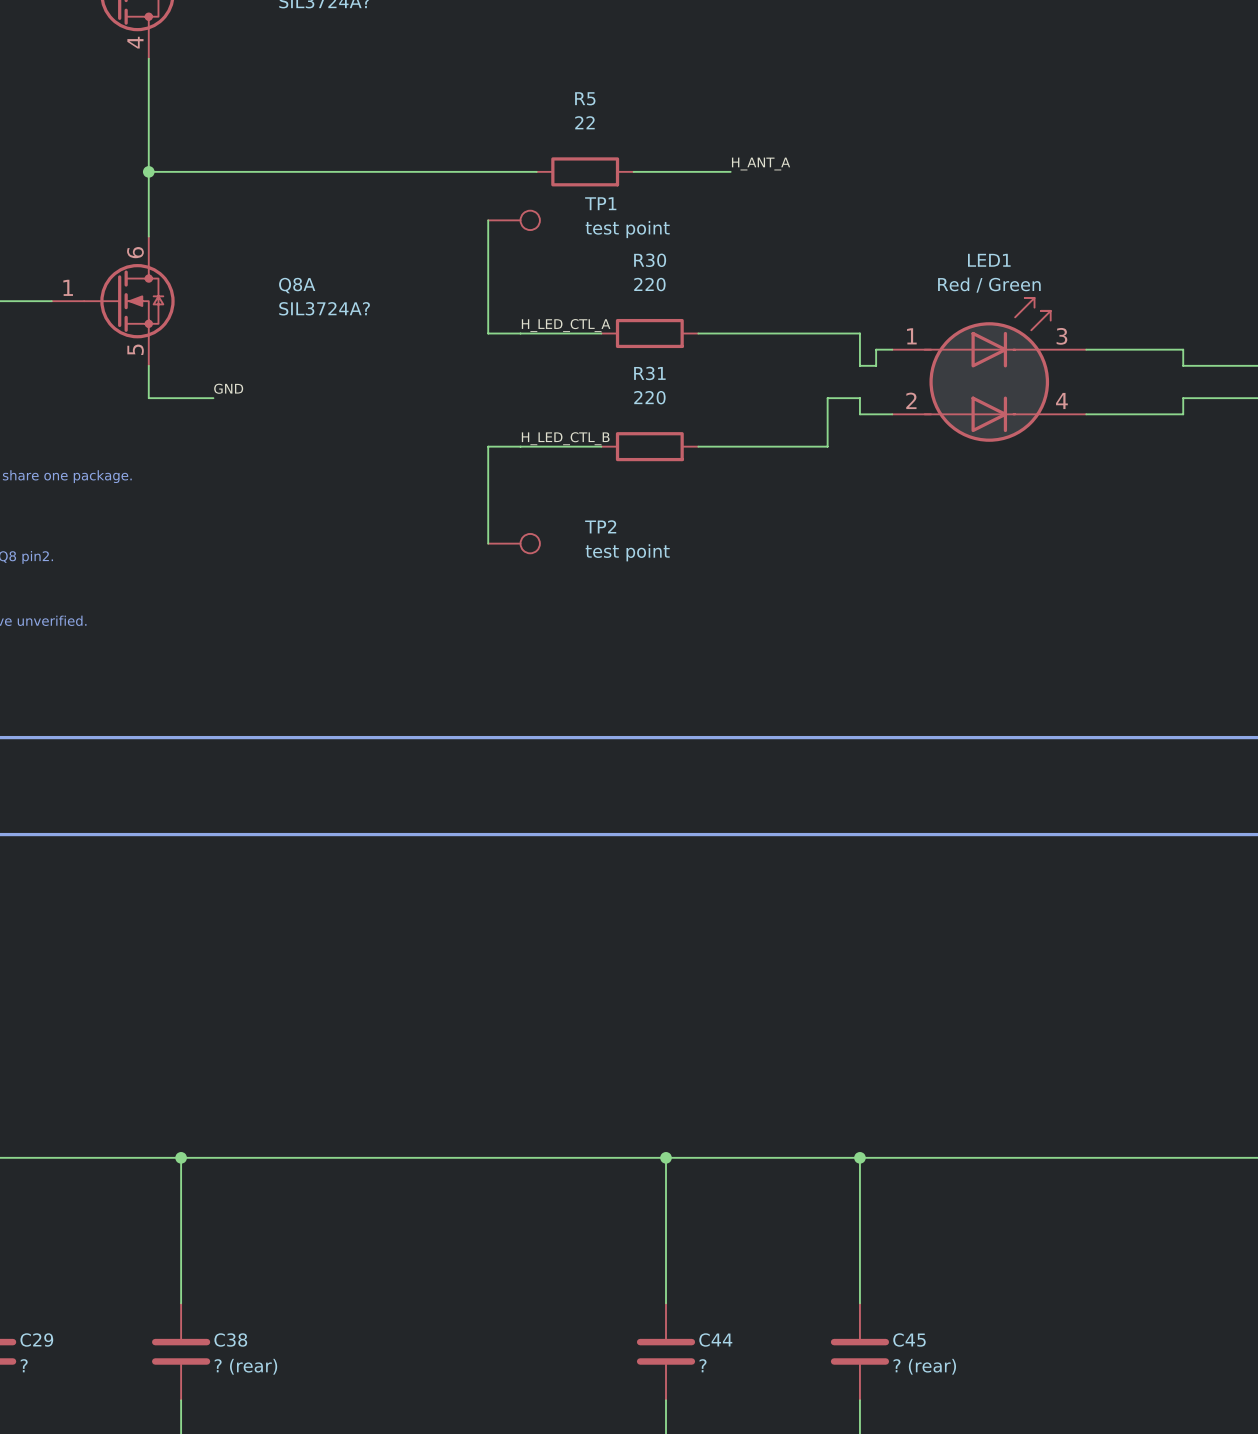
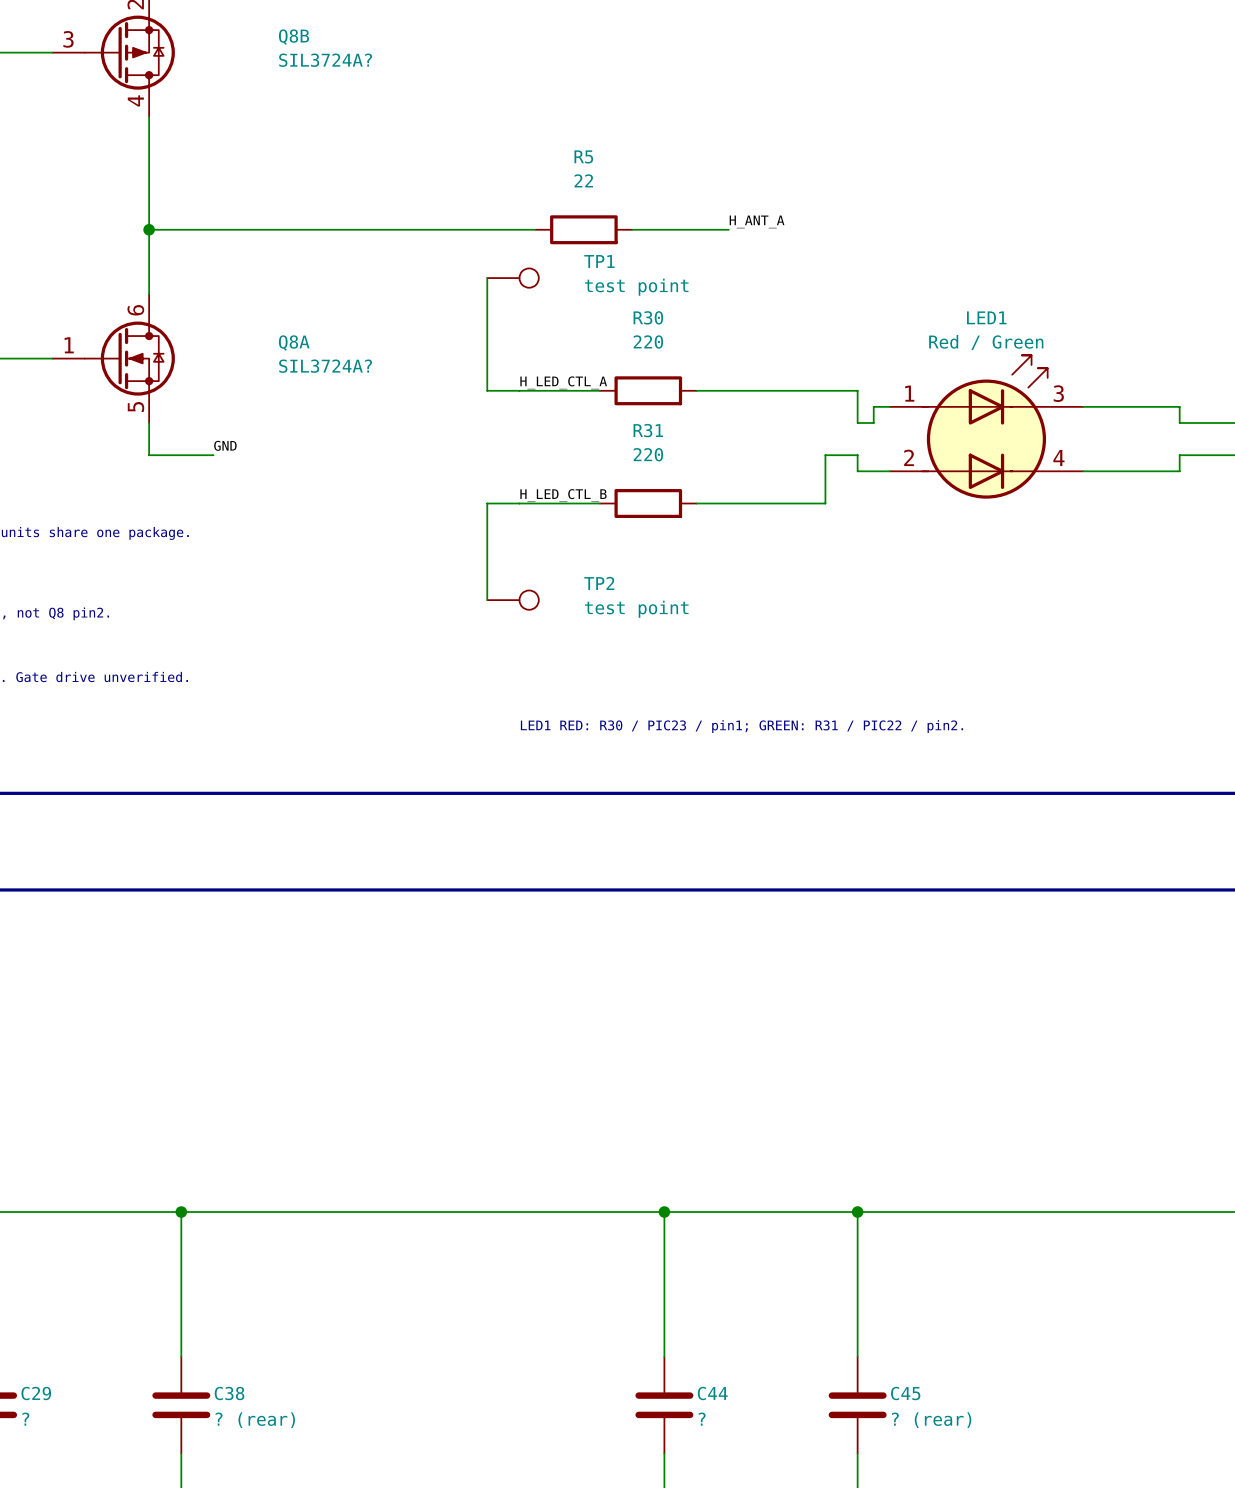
text: none -> LED1 RED: R30 / PIC23 / pin1; GREEN: R31 / PIC22 / pin2. (741, 726)

